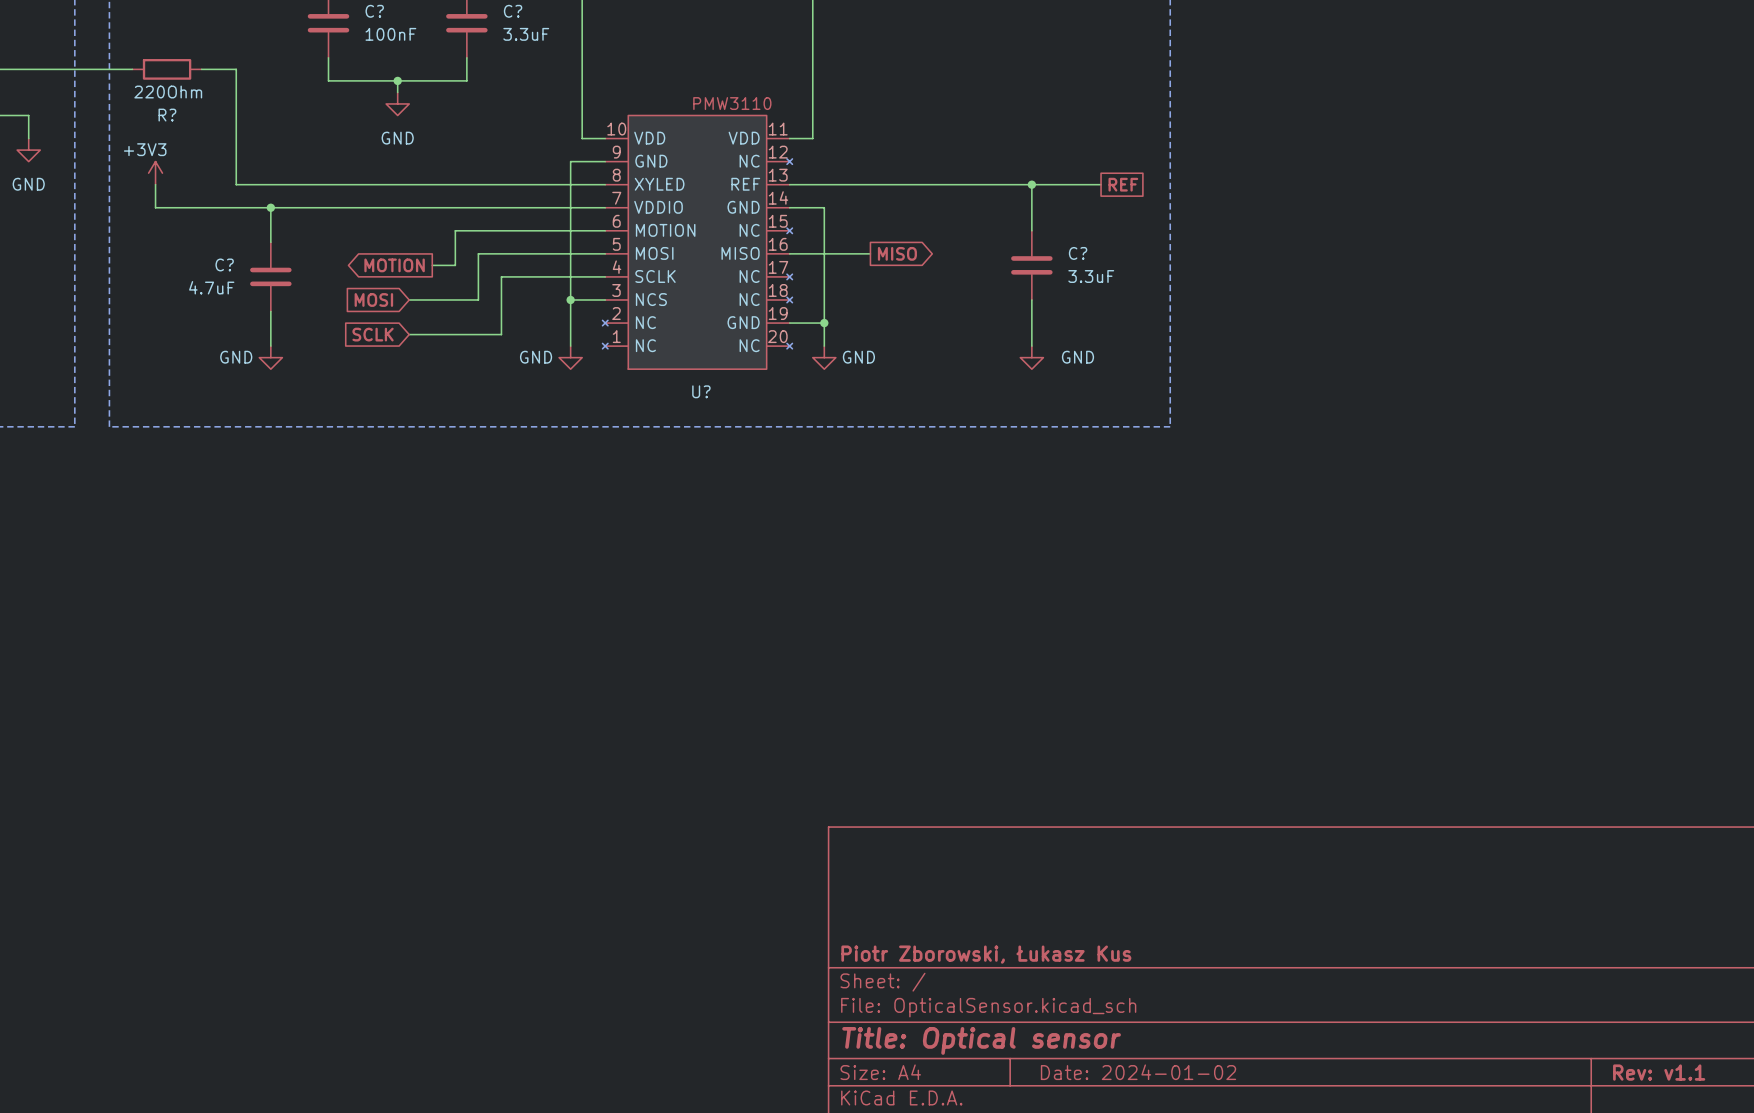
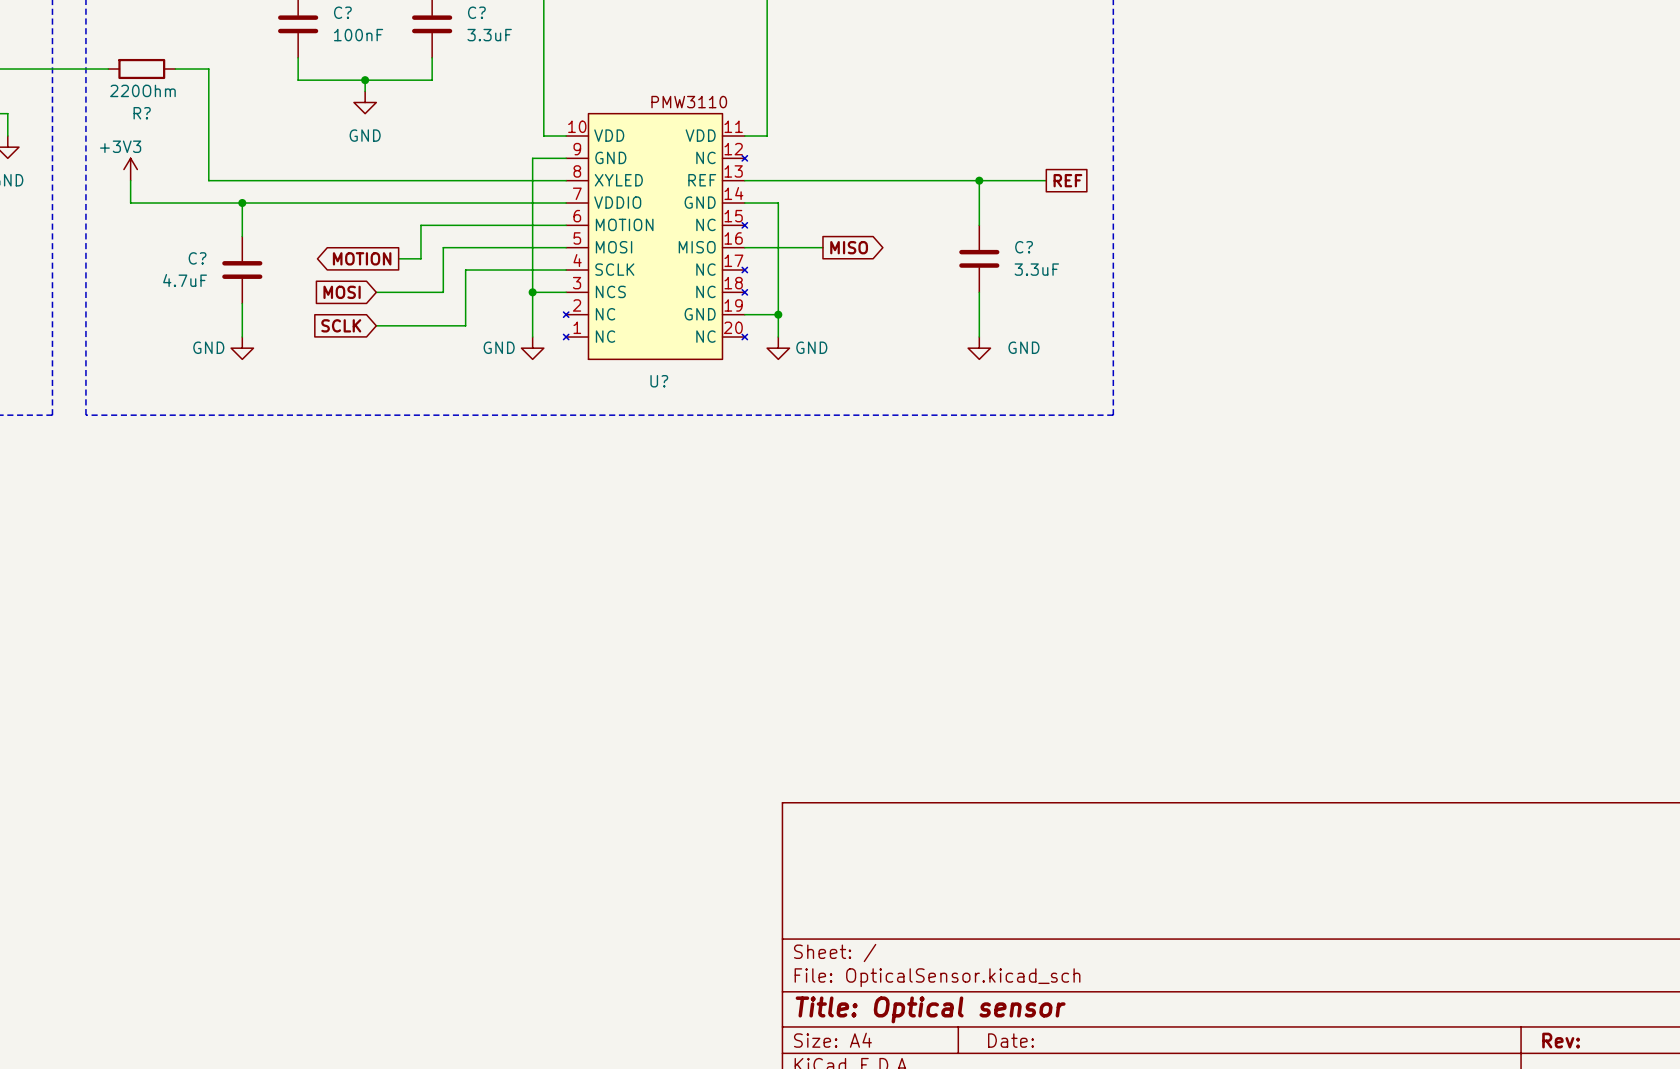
title block: Piotr Zborowski, Łukasz Kus (986, 954) -> none
title block: Date: 2024-01-02 (1138, 1072) -> Date: (1011, 1040)
title block: Rev: v1.1 (1659, 1072) -> Rev: (1561, 1040)

